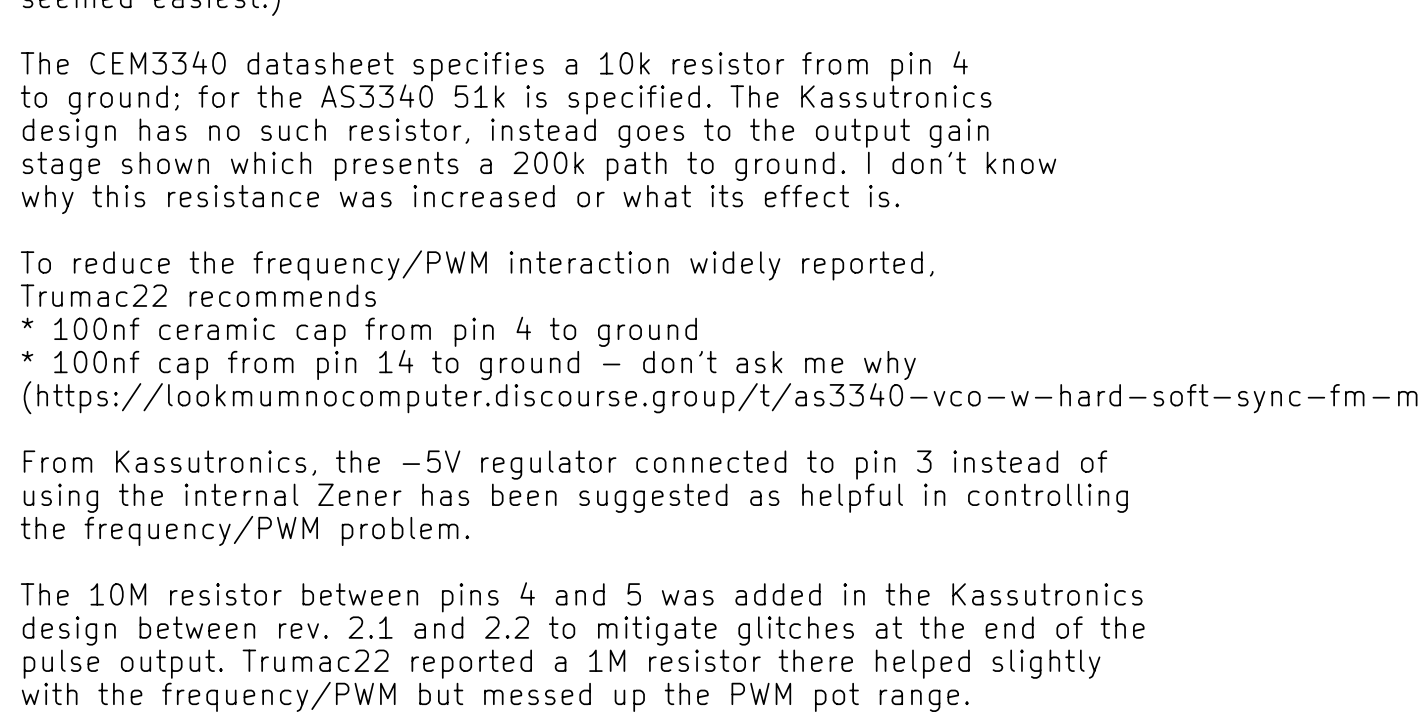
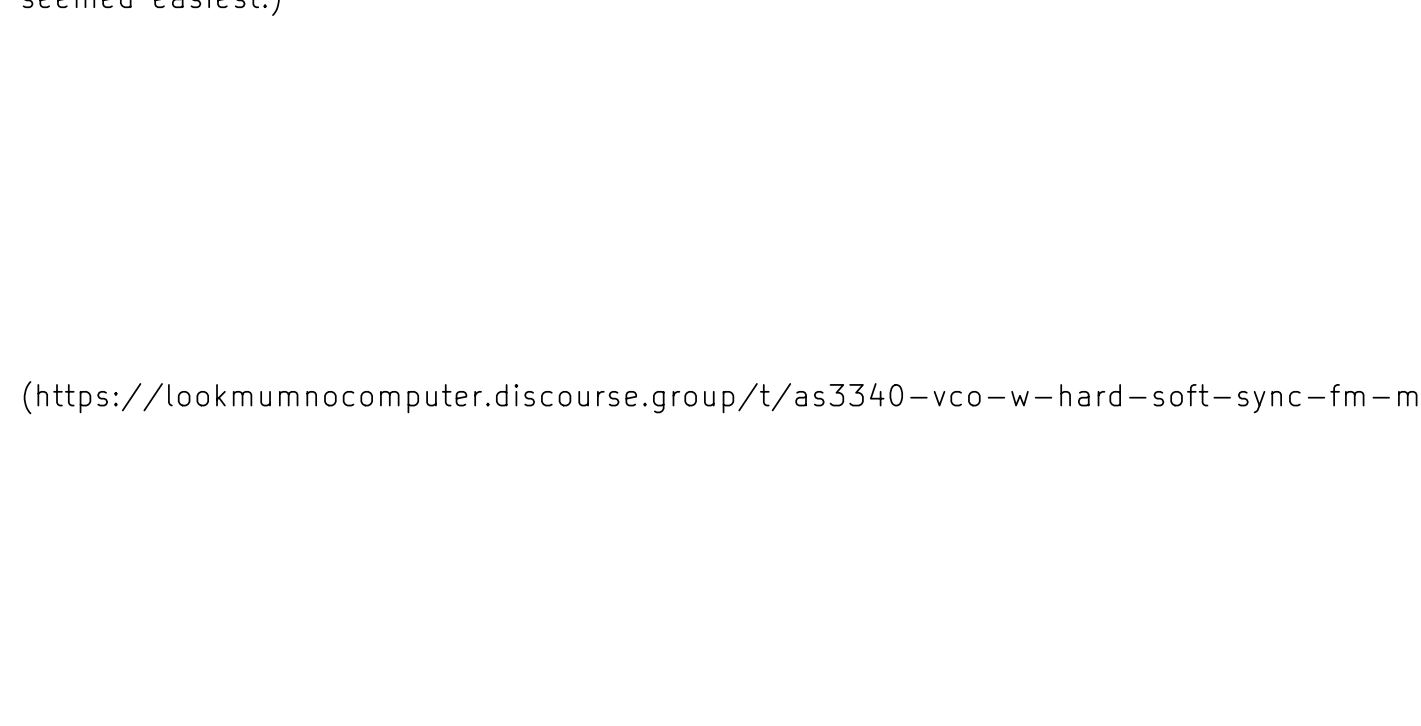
text: The CEM3340 datasheet specifies a 10k resistor from pin 4 (494, 66) -> none
text: to ground; for the AS3340 51k is specified. The Kassutronics (506, 99) -> none
text: design has no such resistor, instead goes to the output gain (505, 133) -> none
text: stage shown which presents a 200k path to ground. I don't know (539, 166) -> none
text: why this resistance was increased or what its effect is. (460, 199) -> none
text: To reduce the frequency/PWM interaction widely reported, (477, 265) -> none
text: Trumac22 recommends (198, 295) -> none
text: * 100nf ceramic cap from pin 4 to ground (359, 331) -> none
text: * 100nf cap from pin 14 to ground - don’t ask me why (468, 364) -> none
text: From Kassutronics, the -5V regulator connected to pin 3 instead of (565, 465) -> none
text: using the internal Zener has been suggested as helpful in controlling (575, 498) -> none
text: the frequency/PWM problem. (244, 530) -> none
text: The 10M resistor between pins 4 and 5 was added in the Kassutronics (581, 597) -> none
text: design between rev. 2.1 and 2.2 to mitigate glitches at the end of the (583, 630) -> none
text: pulse output. Trumac22 reported a 1M resistor there helped slightly (562, 664) -> none
text: with the frequency/PWM but messed up the PWM pot range. (495, 696) -> none

